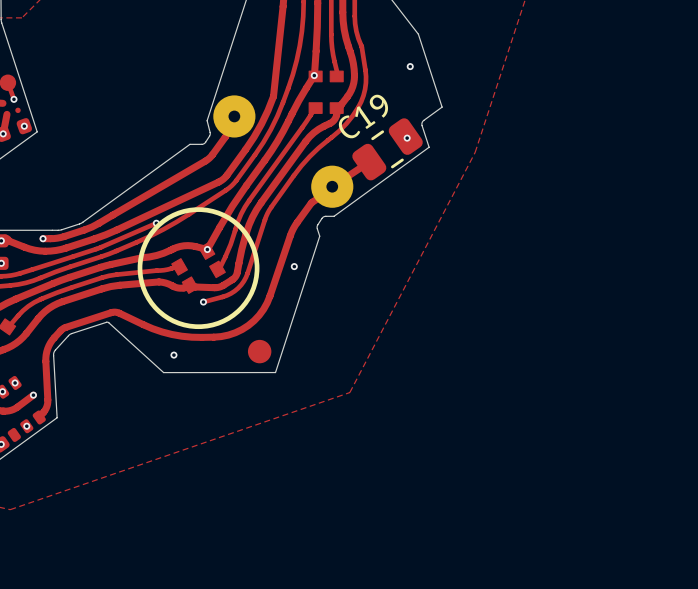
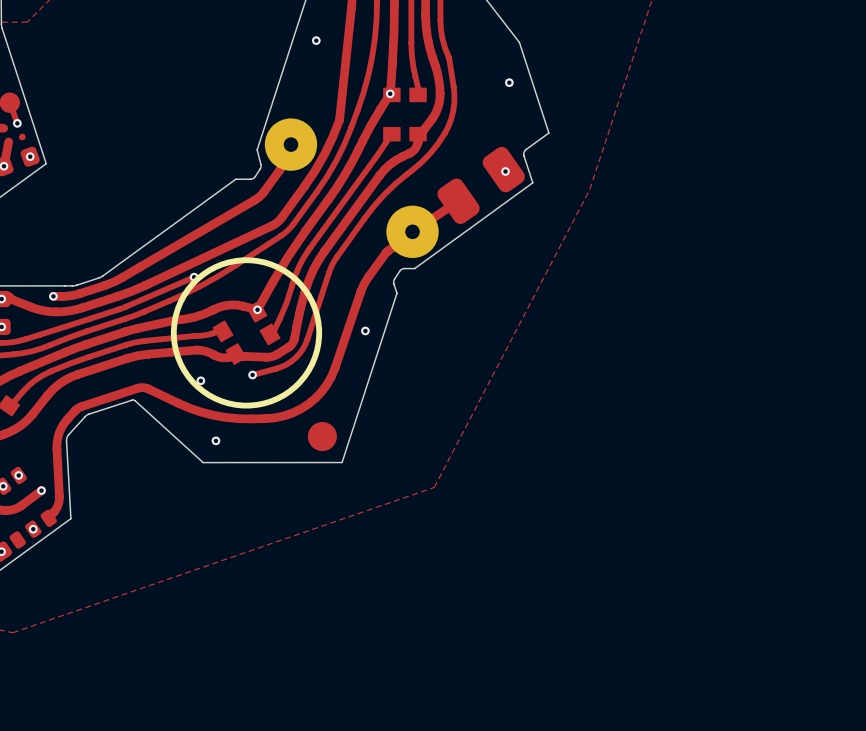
via: none -> (316, 40)
C19: (387, 149) -> none
via: none -> (200, 380)

